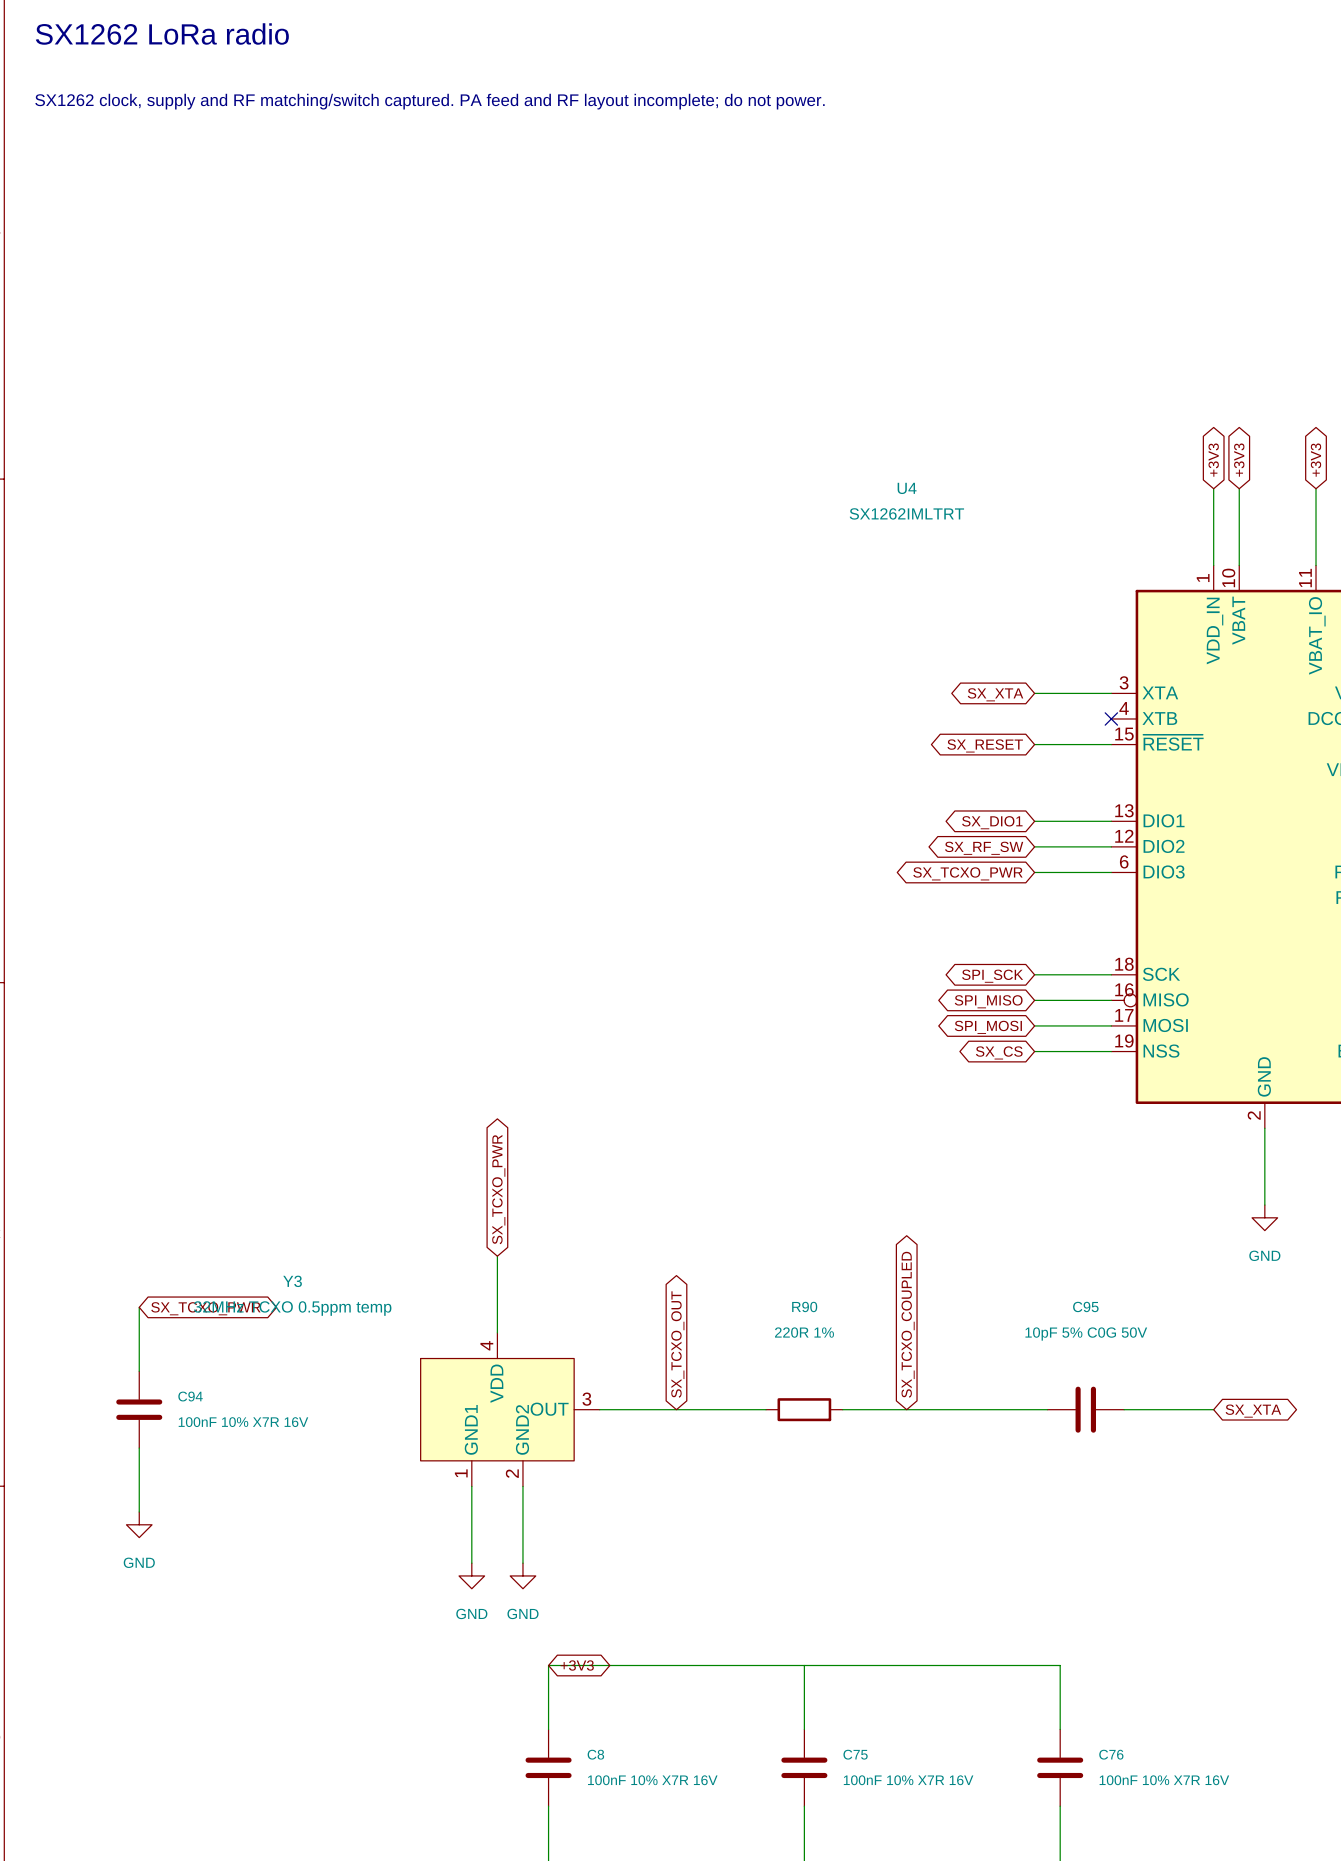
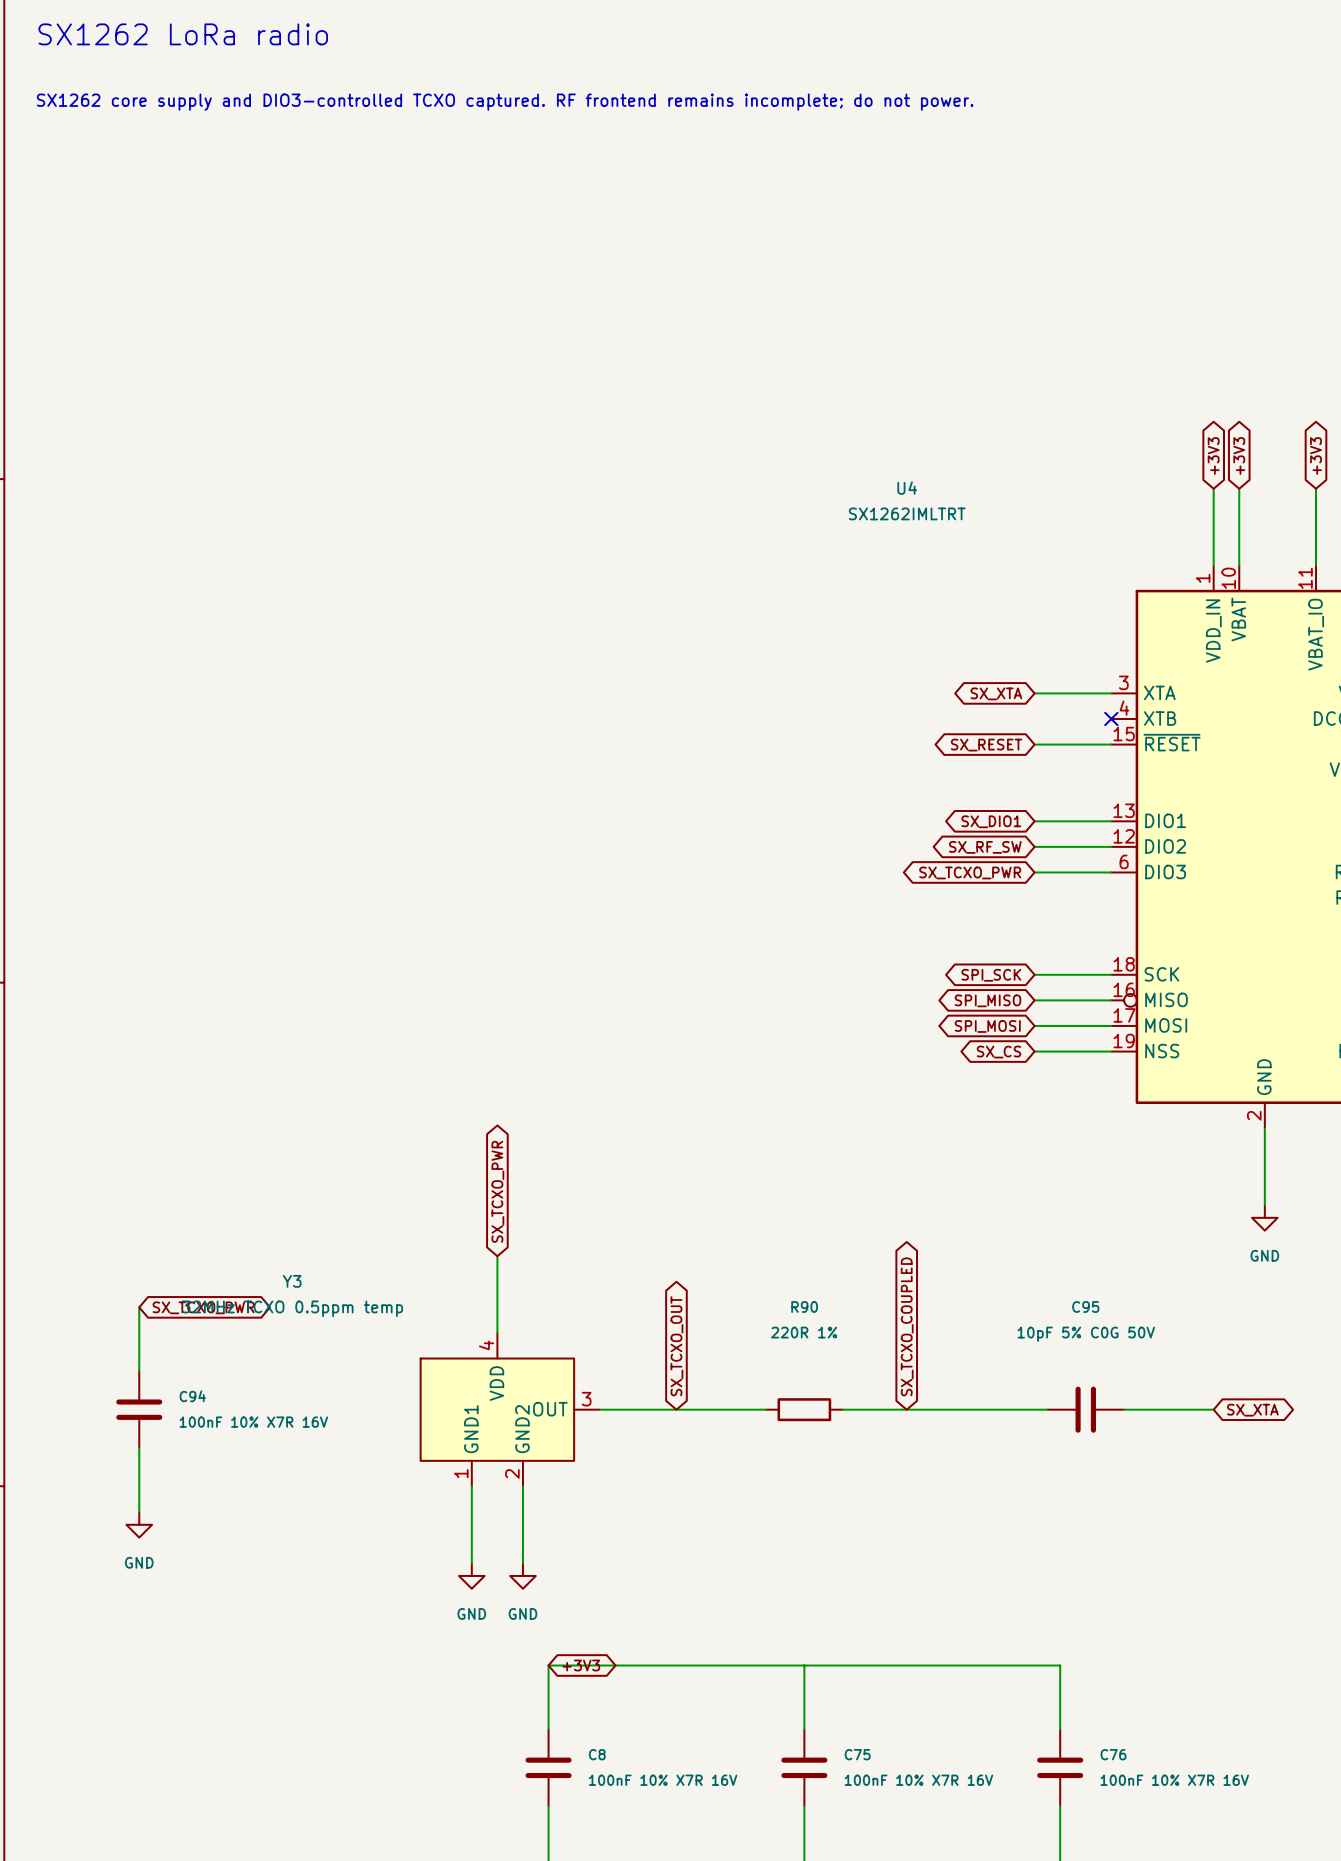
text: SX1262 clock, supply and RF matching/switch captured. PA feed and RF layout incomplete; do not power. (429, 101) -> SX1262 core supply and DIO3-controlled TCXO captured. RF frontend remains incomplete; do not power. (505, 102)

